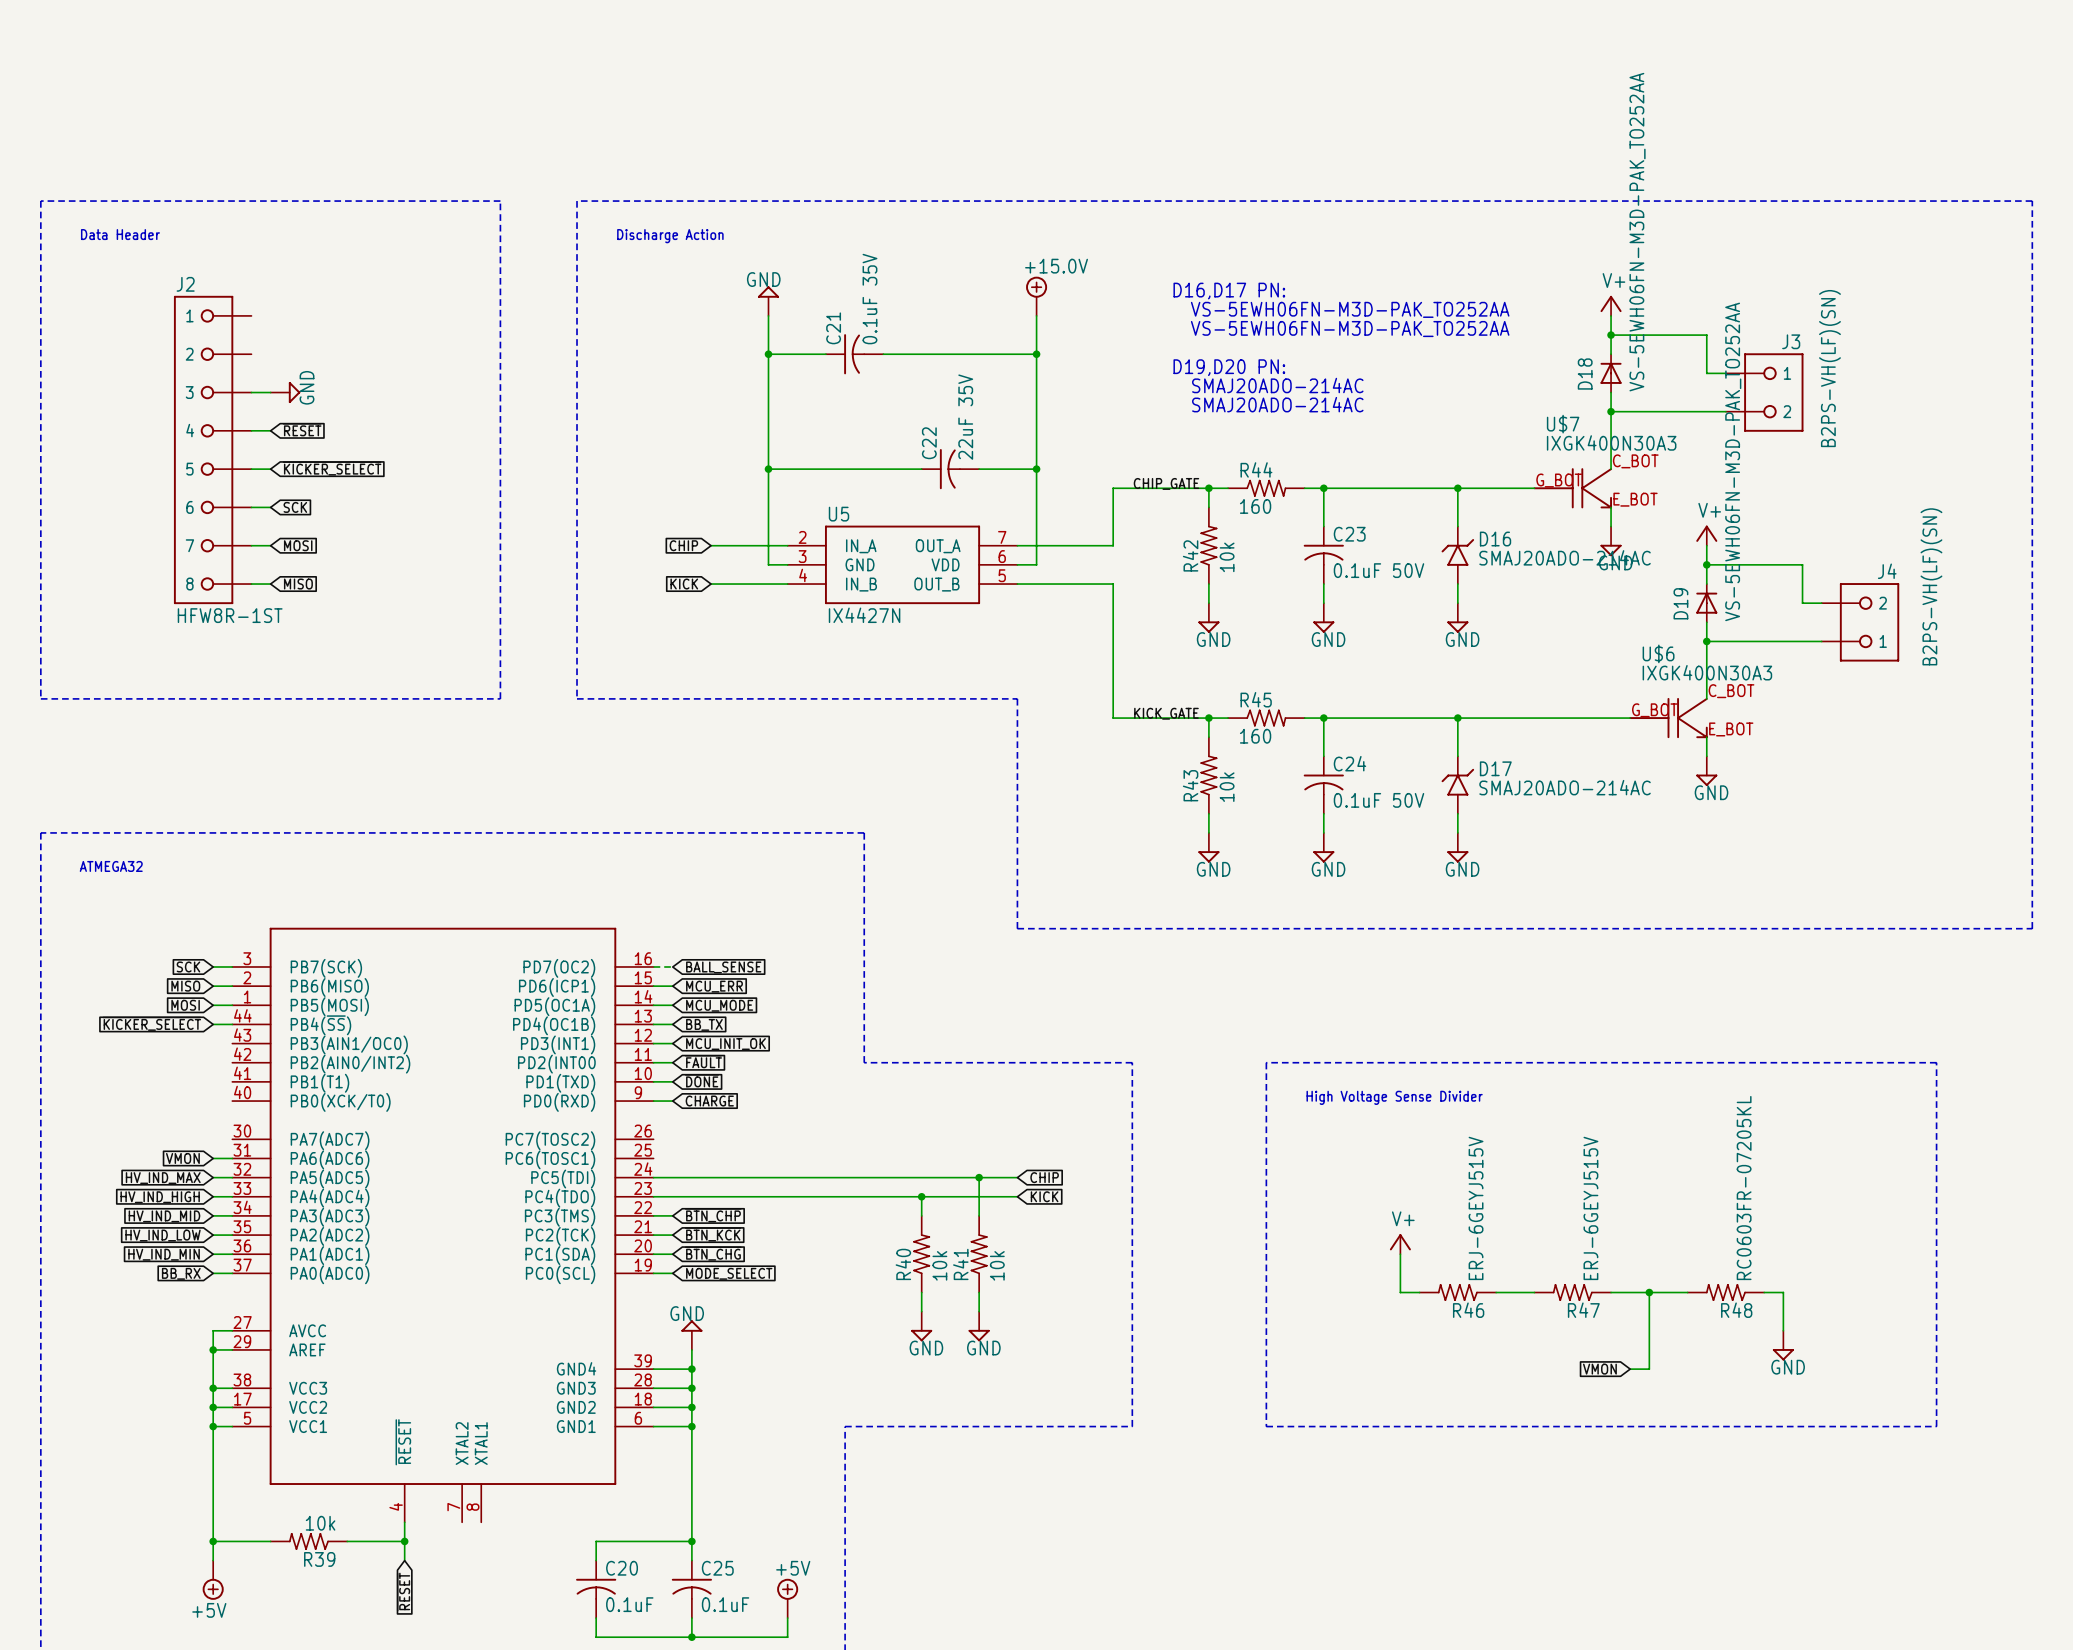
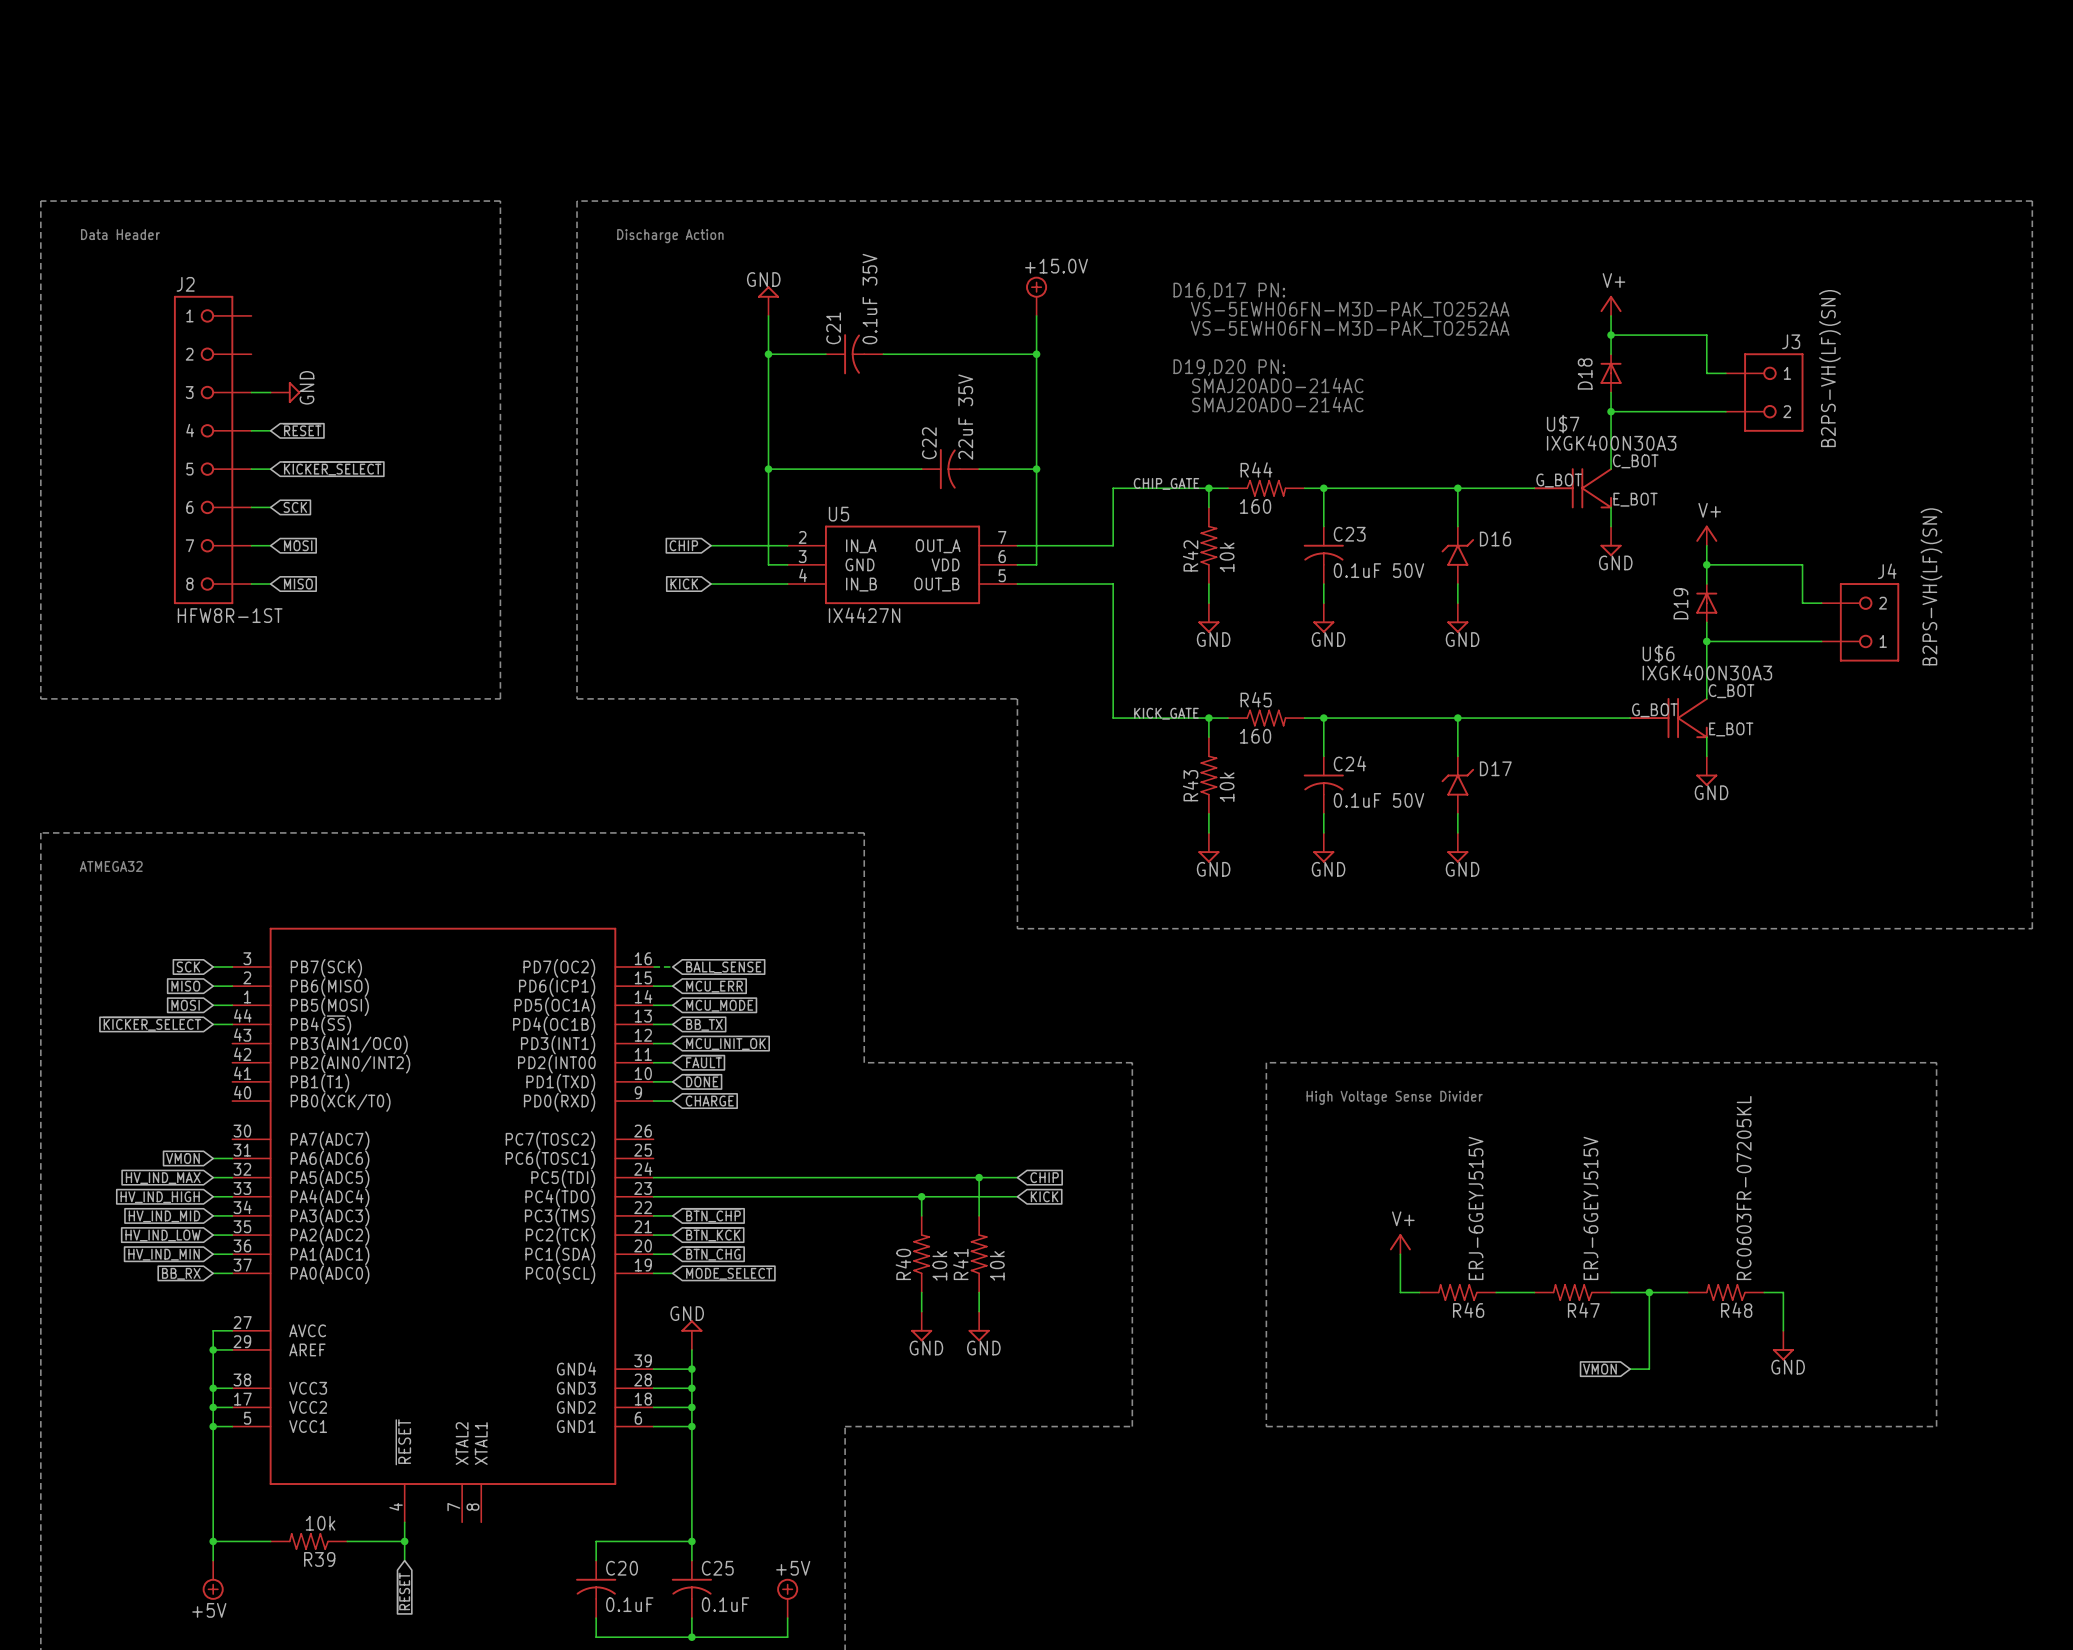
D18 value: VS-5EWH06FN-M3D-PAK_TO252AA (1637, 232) -> none
D19 value: VS-5EWH06FN-M3D-PAK_TO252AA (1733, 461) -> none
D16 value: SMAJ20ADO-214AC (1565, 557) -> none
D17 value: SMAJ20ADO-214AC (1565, 787) -> none

